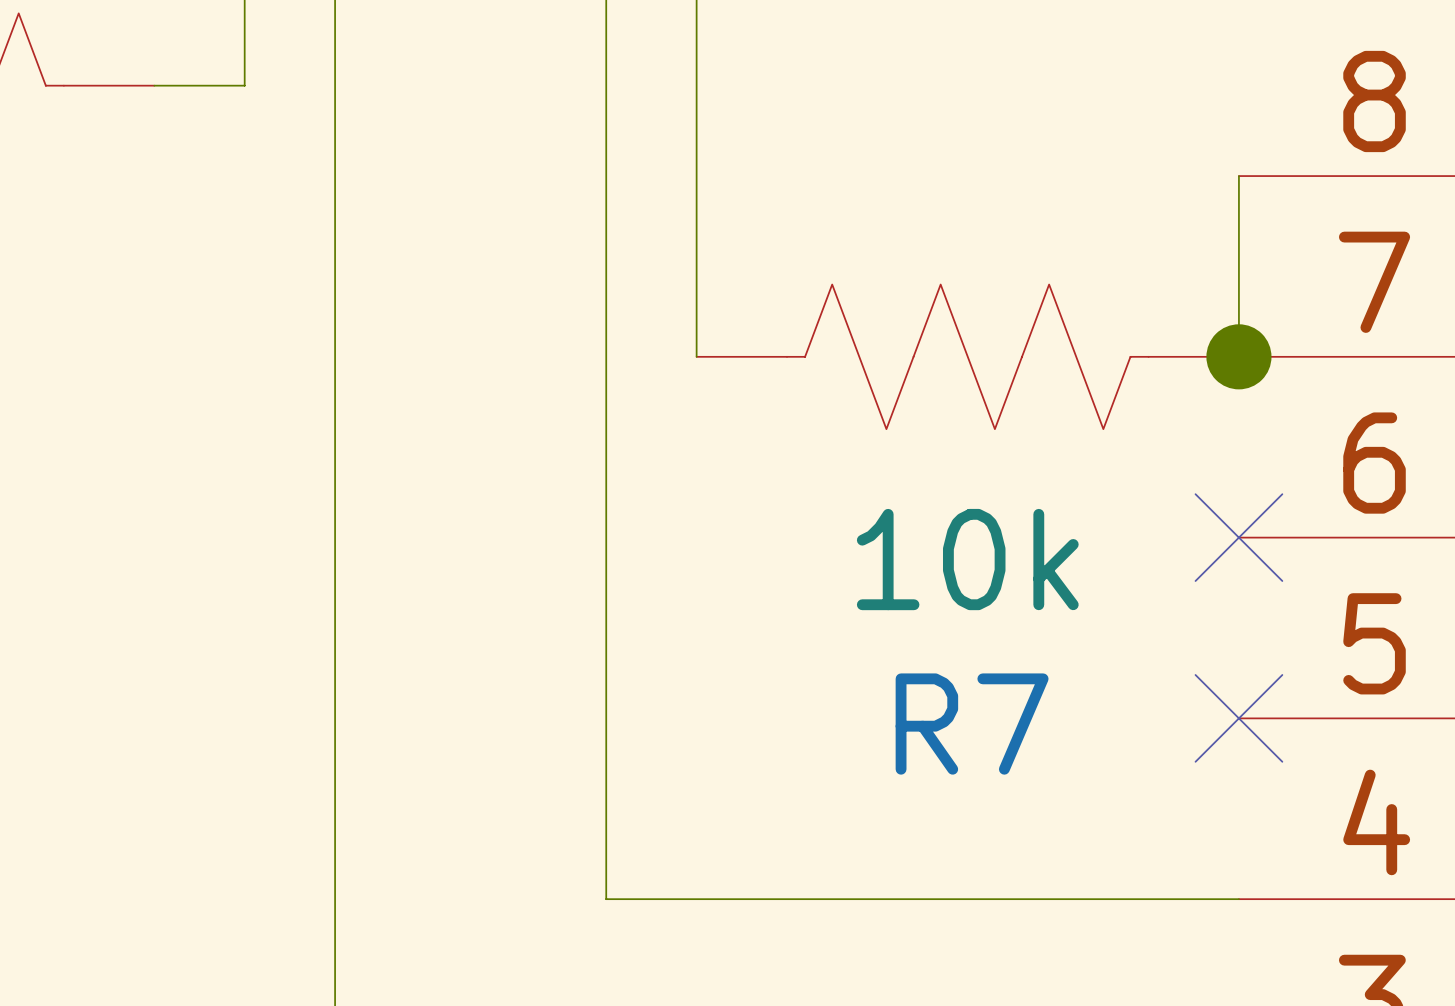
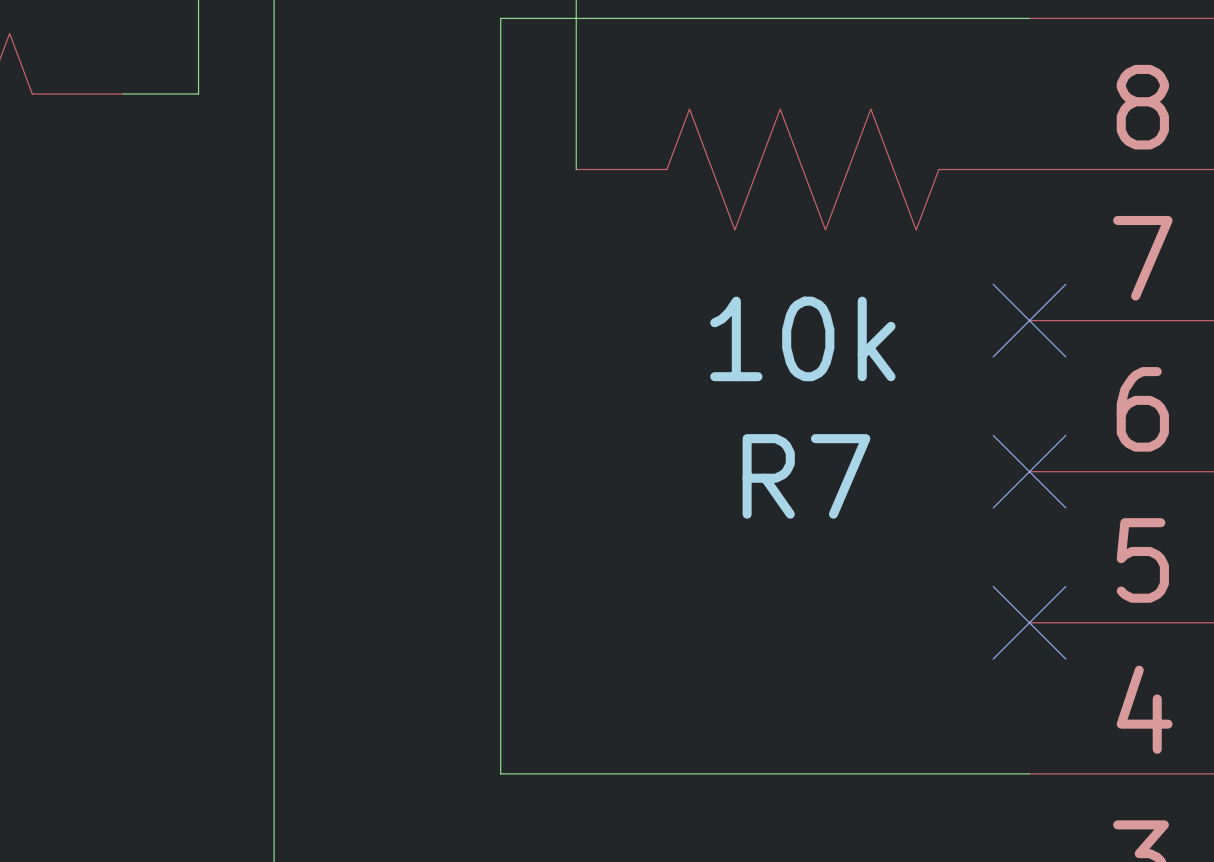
wire: (696, 176) (696, 356) -> none
wire: (1238, 176) (1238, 356) -> none
R7 position: (967, 356) -> (802, 169)
junction: (1238, 356) -> none
no-connect mark: none -> (1029, 320)

